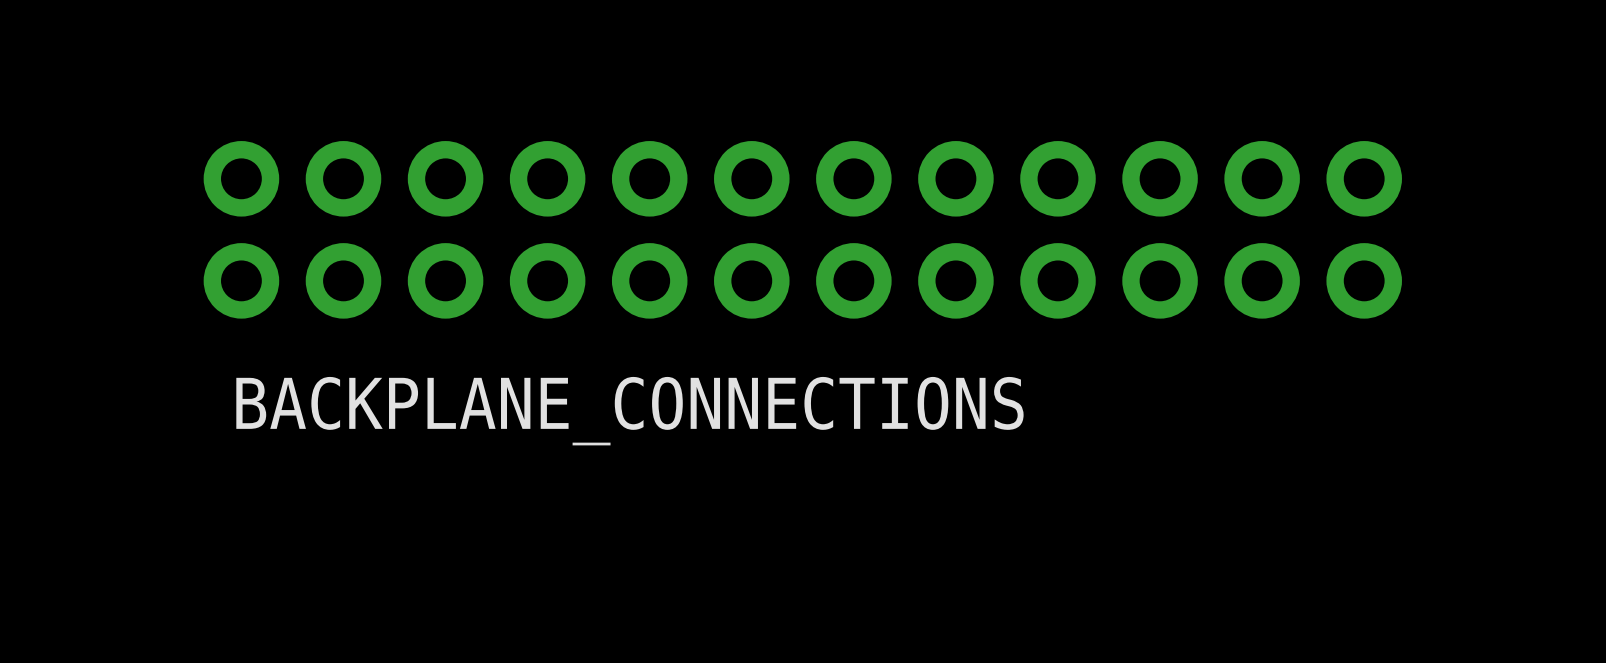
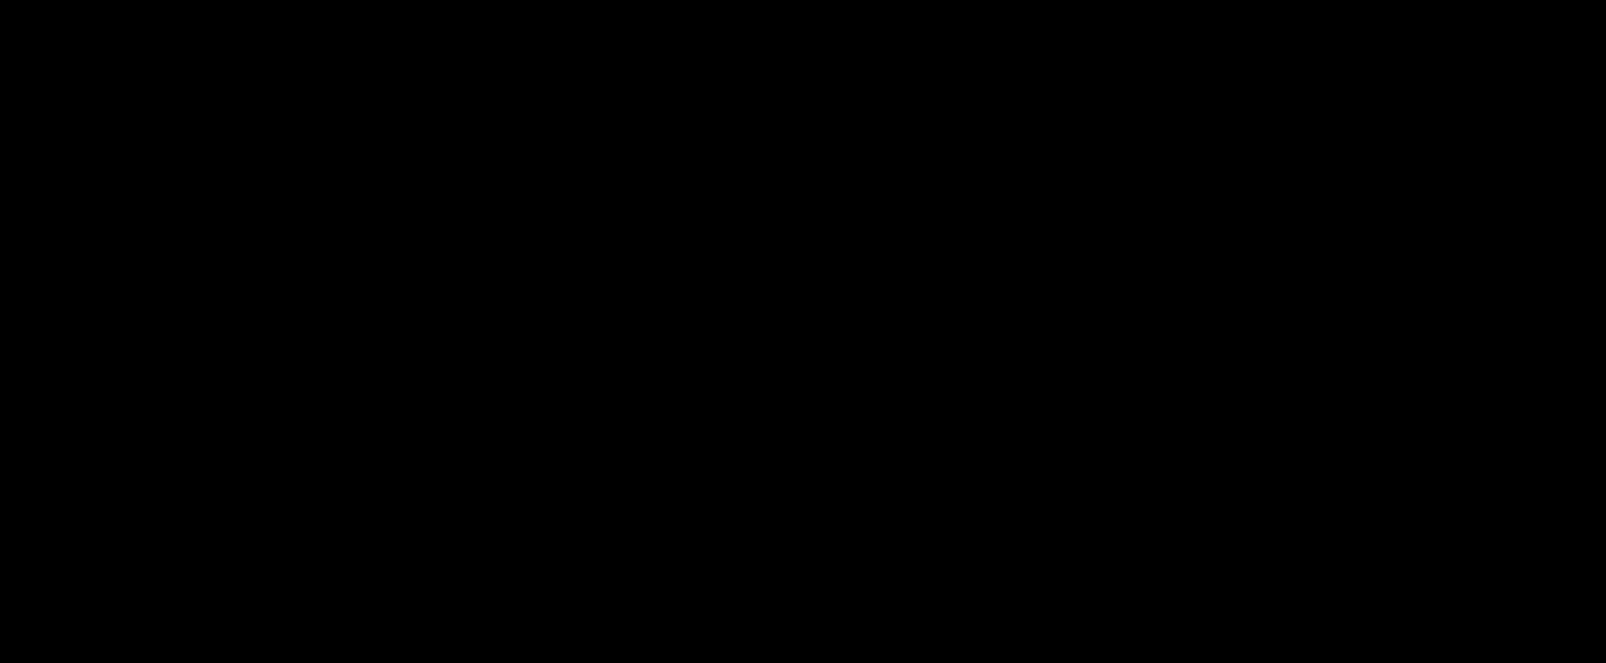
BACKPLANE_CONNECTIONS: (802, 229) -> none

